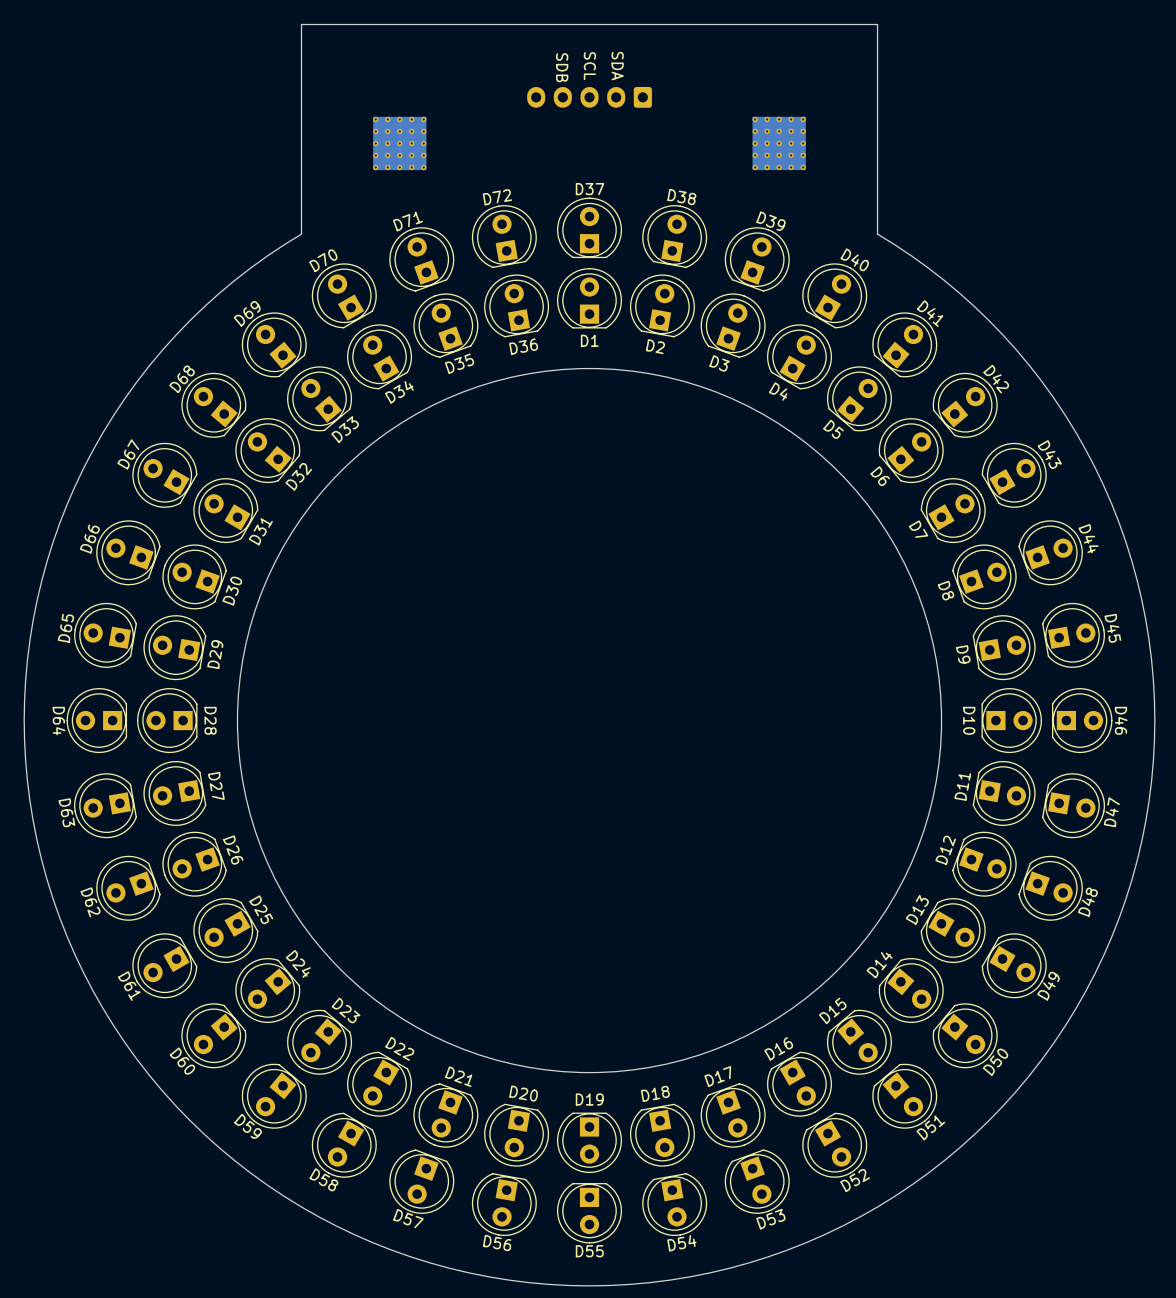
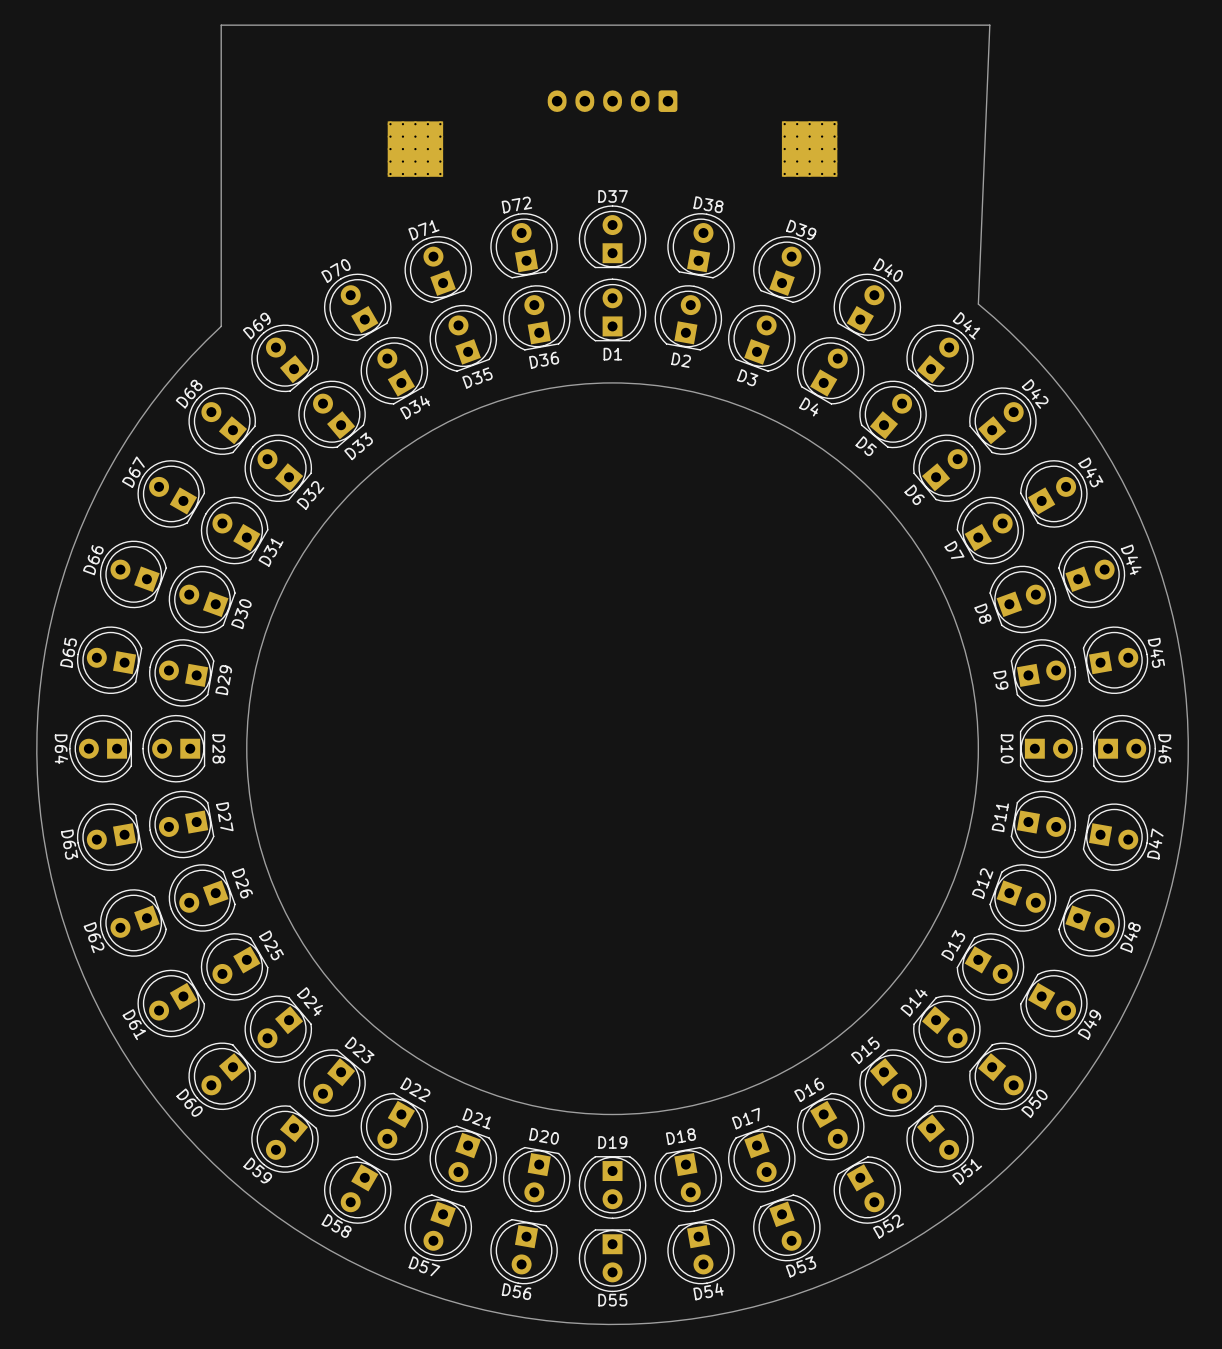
board edge: (877, 24) (877, 234) (927, 267) (974, 306) (1002, 335) (1041, 381) (1064, 414) (1094, 467) (1119, 522) (1137, 580) (1151, 659) (1154, 700) (1153, 760) (1141, 840) (1132, 879) (1111, 936) (1085, 991) (1053, 1042) (1029, 1075) (989, 1120) (959, 1147) (912, 1184) (860, 1216) (805, 1242) (748, 1262) (689, 1276) (649, 1282) (589, 1285) (529, 1282) (489, 1276) (430, 1262) (373, 1242) (318, 1216) (267, 1184) (219, 1147) (189, 1120) (149, 1075) (113, 1026) (93, 991) (67, 936) (47, 879) (33, 820) (27, 780) (24, 720) (27, 659) (37, 600) (47, 560) (67, 503) (103, 431) (137, 381) (162, 350) (219, 293) (251, 267) (301, 234) (301, 24) (877, 24) -> (989, 25) (978, 304) (1009, 331) (1052, 377) (1078, 409) (1112, 462) (1140, 518) (1161, 576) (1177, 637) (1183, 678) (1187, 719) (1188, 761) (1185, 802) (1180, 844) (1171, 885) (1160, 925) (1146, 964) (1119, 1020) (1087, 1074) (1049, 1123) (1021, 1154) (974, 1196) (941, 1221) (888, 1254) (851, 1272) (793, 1295) (732, 1311) (671, 1321) (629, 1324) (567, 1322) (525, 1317) (464, 1305) (405, 1285) (348, 1260) (294, 1228) (244, 1191) (198, 1148) (170, 1117) (145, 1084) (111, 1032) (92, 995) (75, 957) (56, 897) (47, 857) (40, 815) (36, 753) (37, 712) (42, 670) (53, 609) (72, 549) (97, 492) (127, 437) (151, 403) (177, 371) (221, 326) (221, 25) (989, 25)
text: SCL (589, 66) -> none
text: SDA (617, 66) -> none
text: SDB (562, 67) -> none

